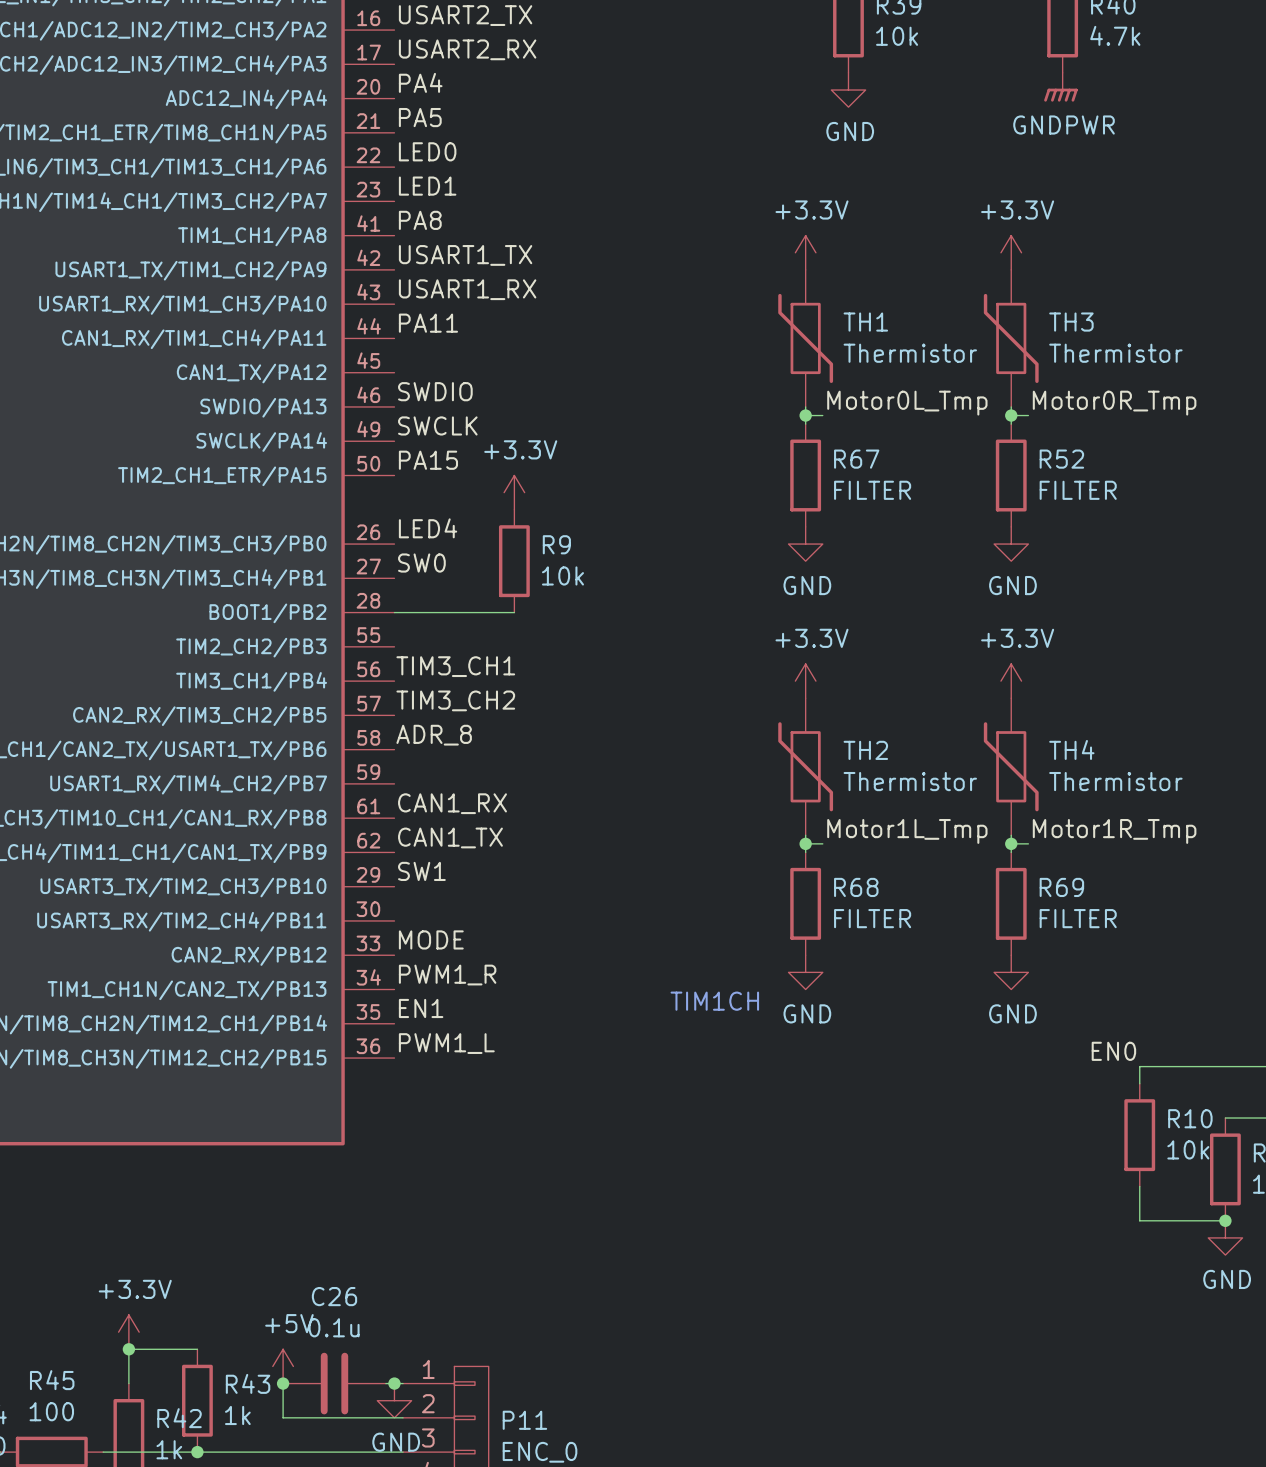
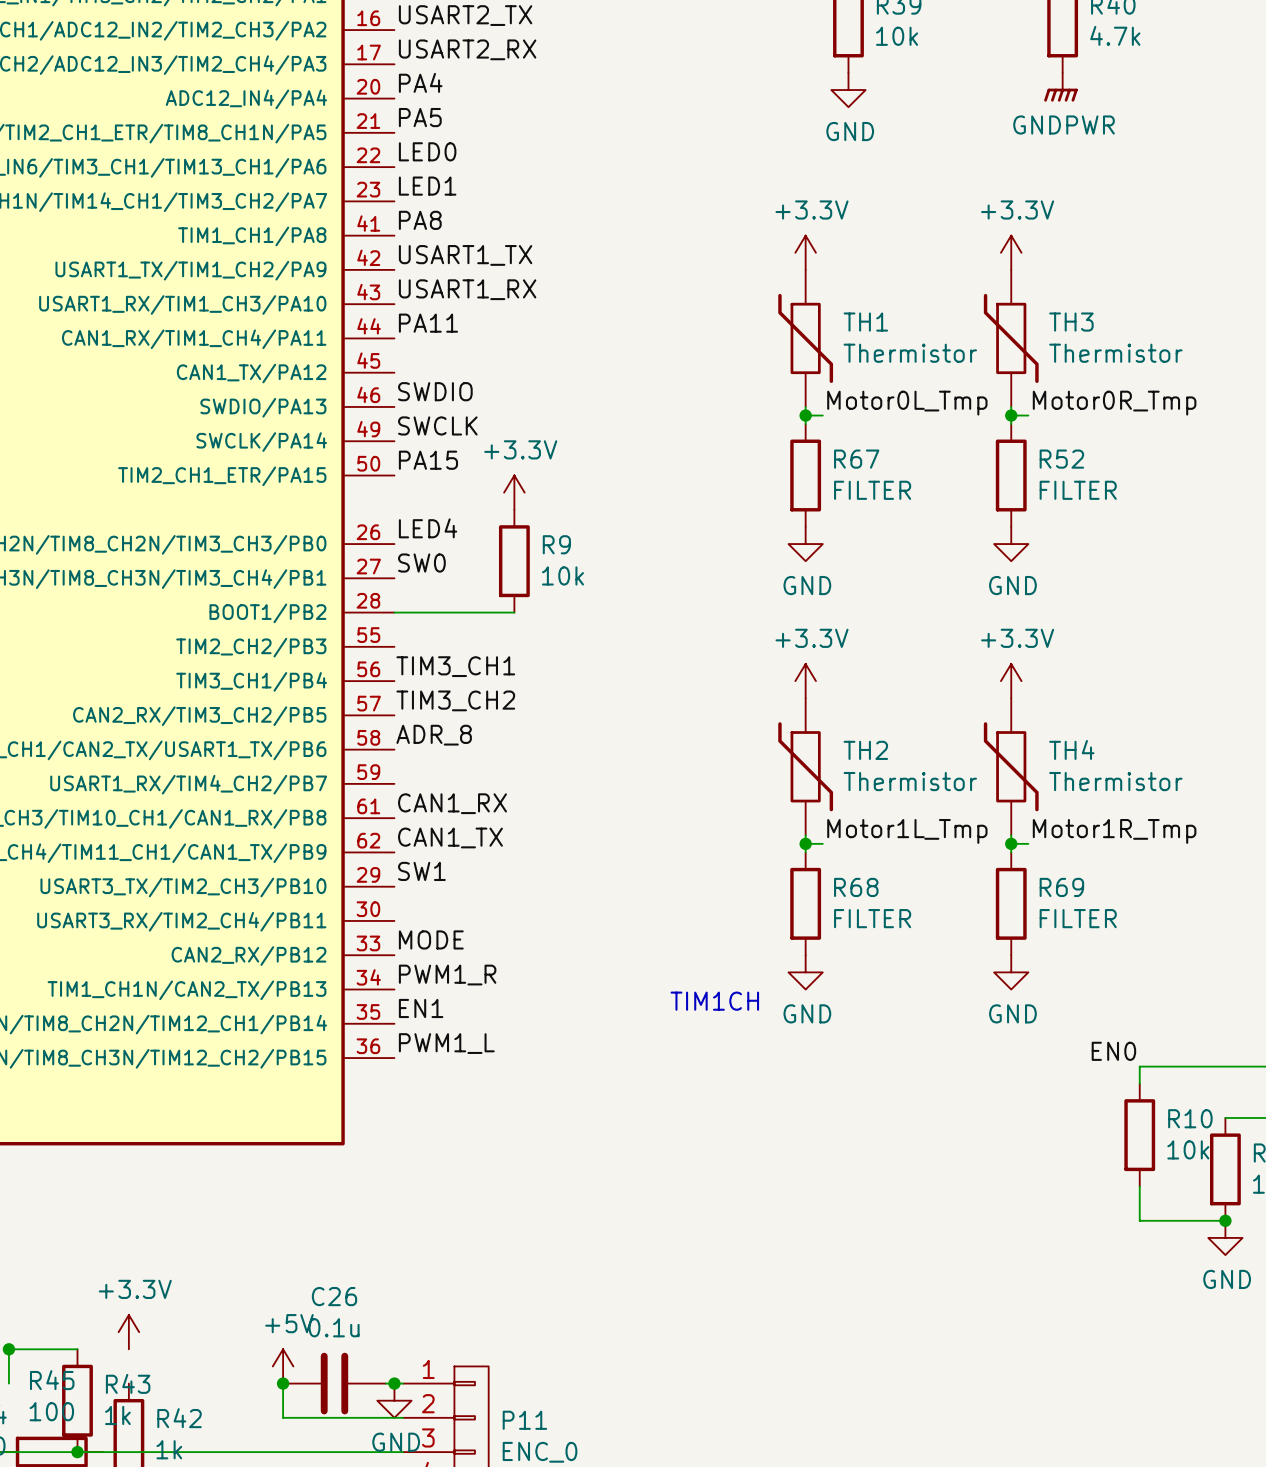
junction: none -> (8, 1349)
junction: (128, 1349) -> none
wire: (197, 1349) (128, 1349) (128, 1383) -> (77, 1349) (8, 1349) (8, 1383)
R43 position: (197, 1400) -> (77, 1400)
wire: none -> (0, 1452) (103, 1452)
junction: none -> (77, 1452)
junction: (197, 1452) -> none

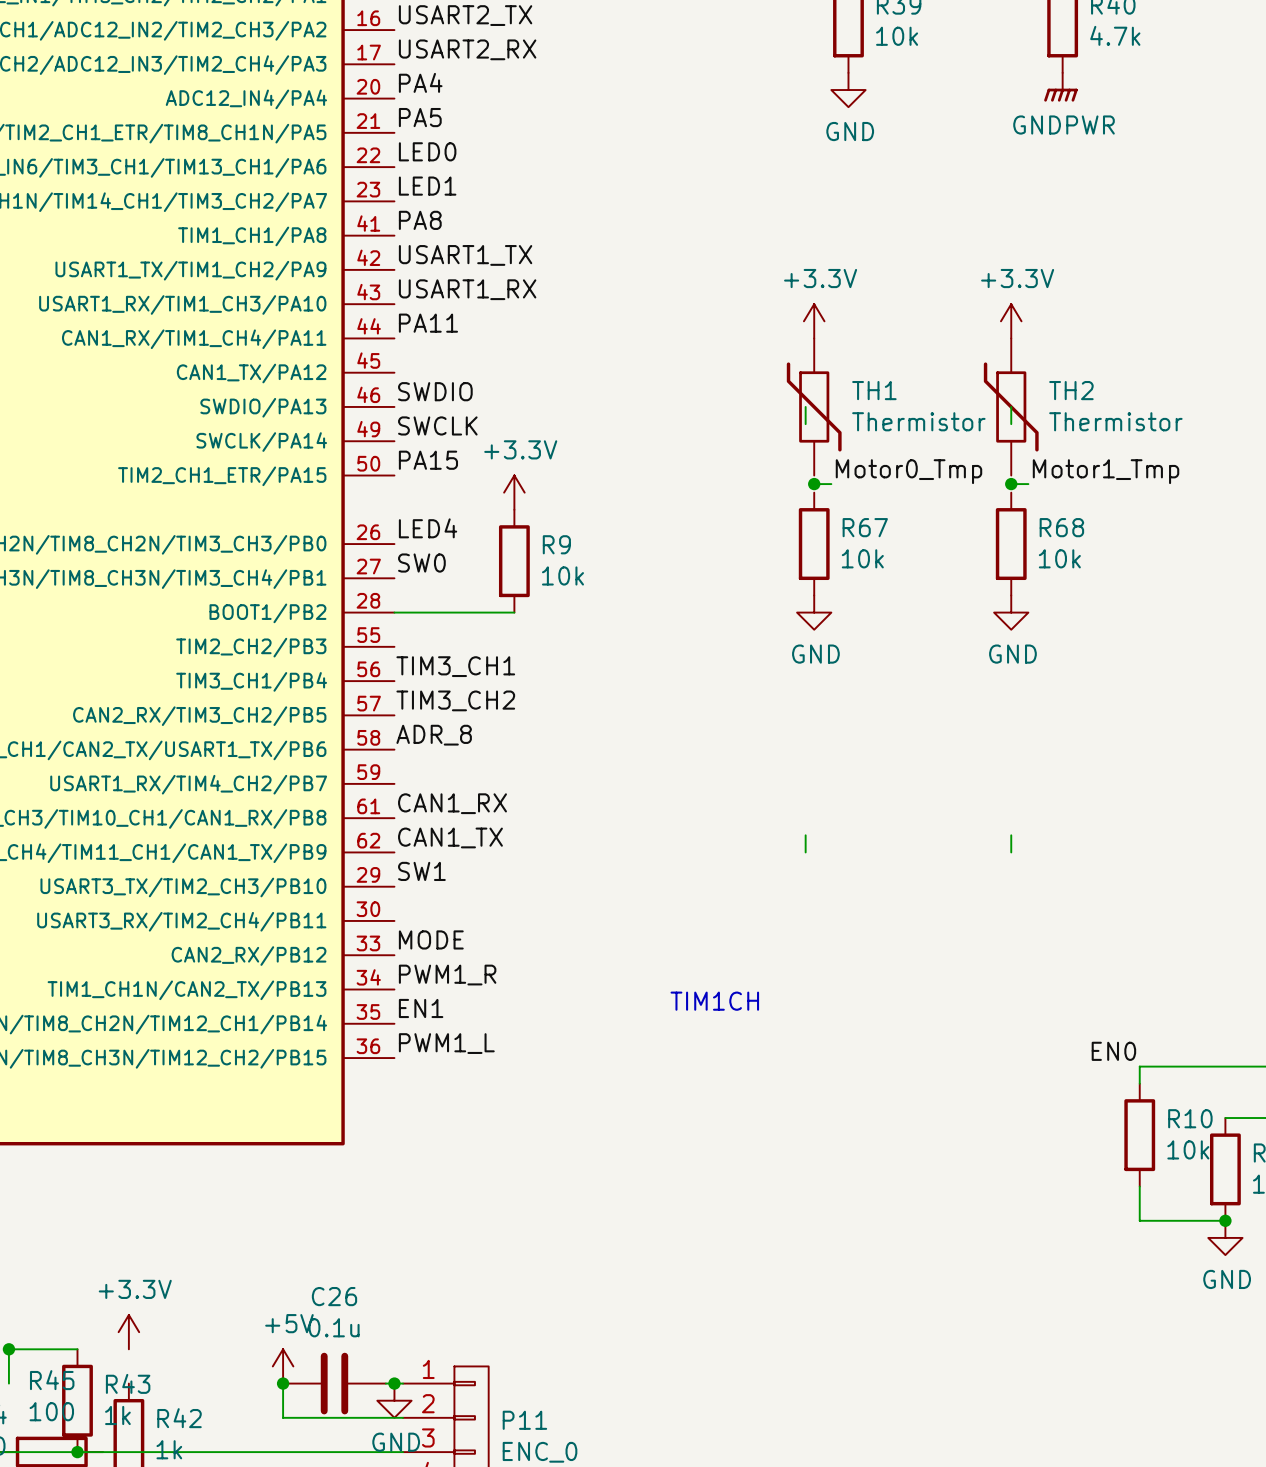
power symbol position: +3.3V (805, 252) -> +3.3V (814, 321)
power symbol position: +3.3V (1011, 252) -> +3.3V (1011, 321)
TH1 position: (805, 338) -> (814, 406)
TH3: Thermistor (1011, 338) -> none
label: Motor0L_Tmp (907, 403) -> none
label: Motor0R_Tmp (1114, 403) -> none
wire: (805, 415) (822, 415) -> (814, 484) (831, 484)
junction position: (805, 415) -> (814, 484)
wire: (1011, 415) (1028, 415) -> (1011, 484) (1028, 484)
junction position: (1011, 415) -> (1011, 484)
label: none -> Motor0_Tmp (908, 471)
label: none -> Motor1_Tmp (1106, 471)
R67 position: (805, 475) -> (814, 544)
R52: FILTER (1011, 475) -> none
R67 value: FILTER (872, 490) -> 10k (862, 558)
power symbol position: GND (805, 544) -> GND (814, 612)
power symbol position: GND (1011, 544) -> GND (1011, 612)
power symbol: +3.3V (805, 681) -> none
power symbol: +3.3V (1011, 681) -> none
TH2 position: (805, 766) -> (1011, 406)
TH4: Thermistor (1011, 766) -> none
label: Motor1L_Tmp (907, 831) -> none
label: Motor1R_Tmp (1114, 831) -> none
wire: (805, 843) (822, 843) -> none
junction: (805, 843) -> none
wire: (1011, 843) (1028, 843) -> none
junction: (1011, 843) -> none
R68 position: (805, 903) -> (1011, 544)
R69: FILTER (1011, 903) -> none
R68 value: FILTER (872, 918) -> 10k (1059, 558)
power symbol: GND (805, 972) -> none
power symbol: GND (1011, 972) -> none

